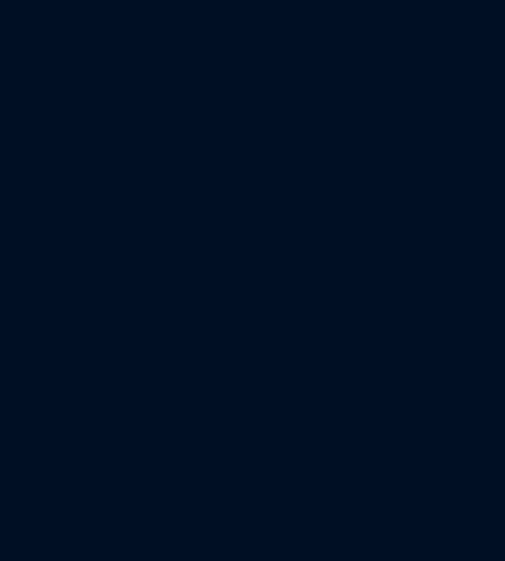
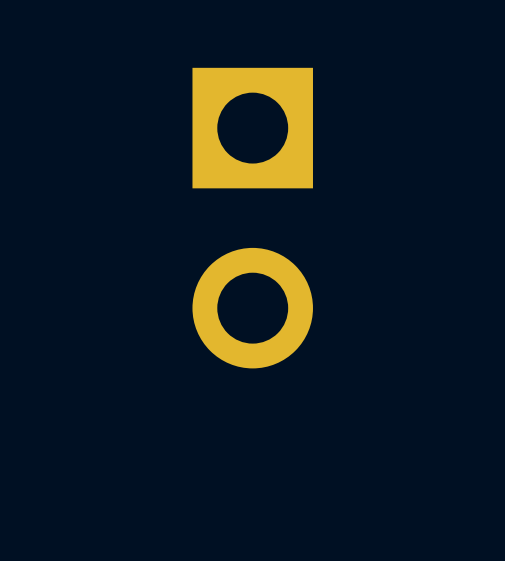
part: none -> (252, 218)

